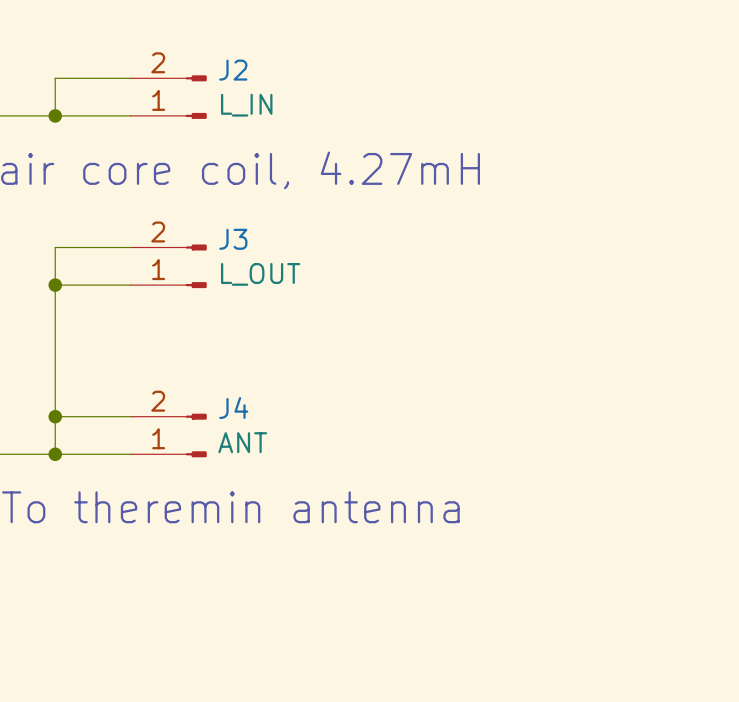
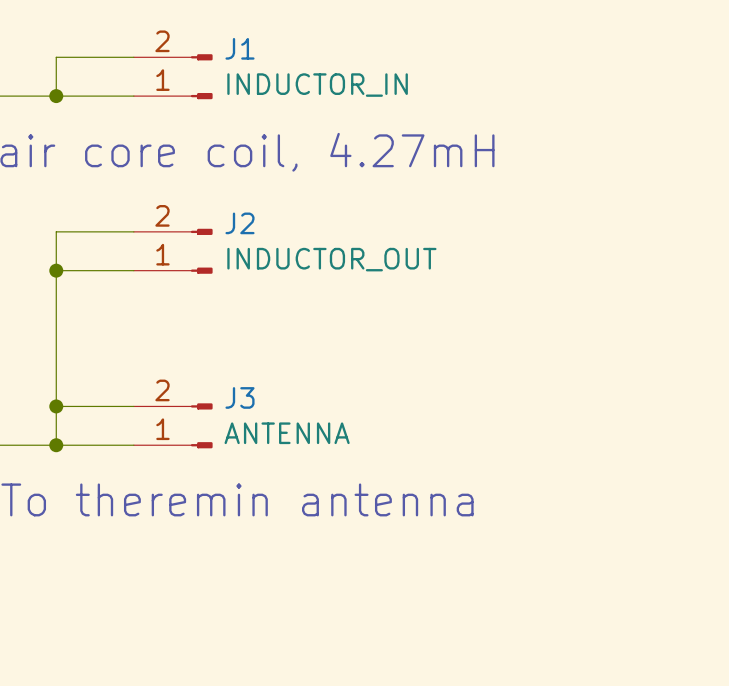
J2 name: J2 (233, 70) -> J1 (240, 48)
J2 value: L_IN (246, 105) -> INDUCTOR_IN (317, 85)
J3 name: J3 (233, 239) -> J2 (240, 223)
J3 value: L_OUT (260, 274) -> INDUCTOR_OUT (331, 259)
J4 name: J4 (233, 408) -> J3 (240, 397)
J4 value: ANT (242, 442) -> ANTENNA (287, 433)

